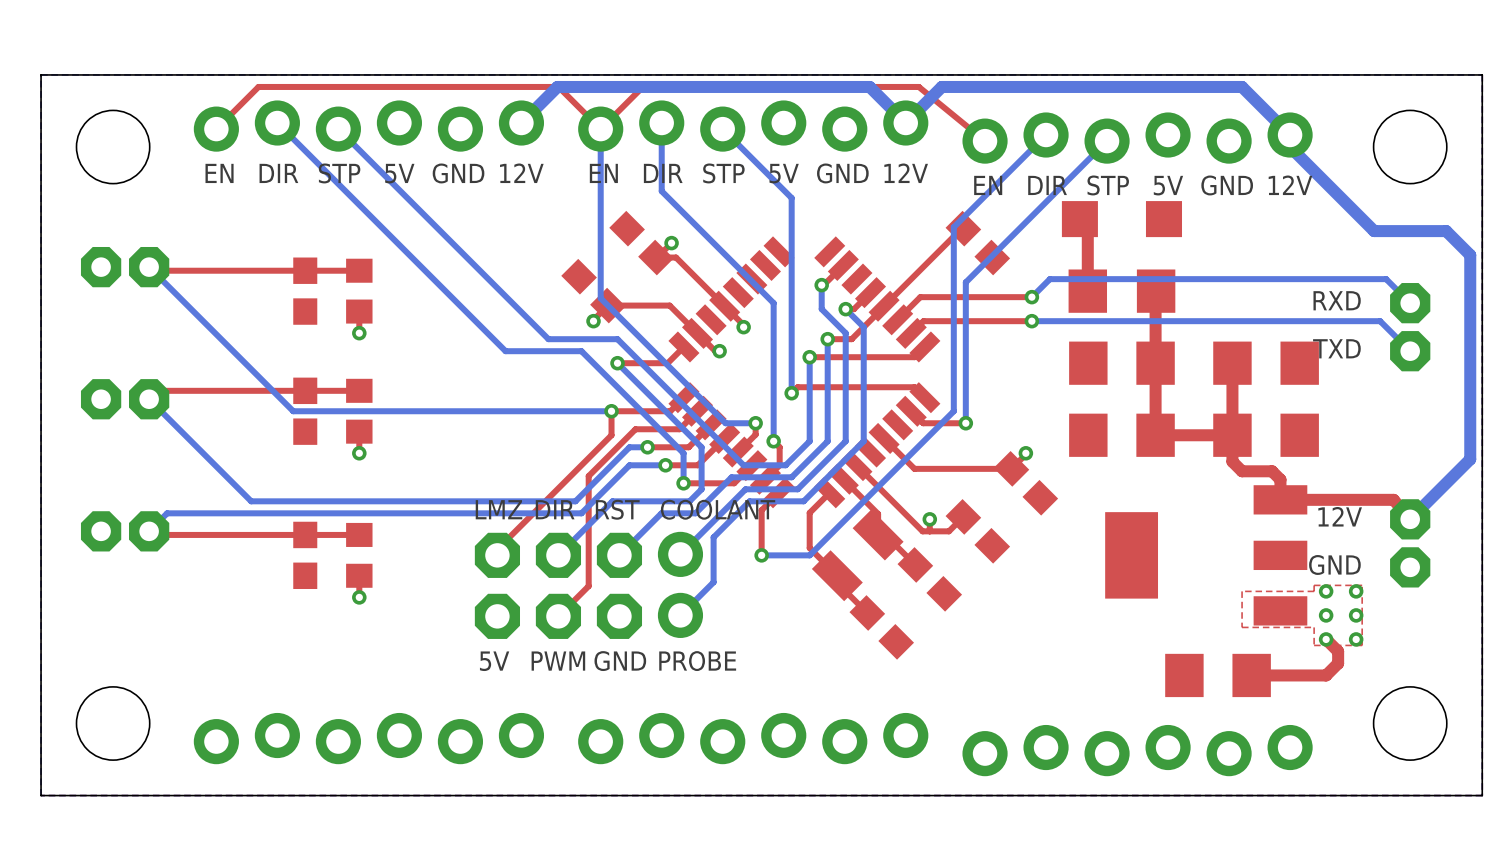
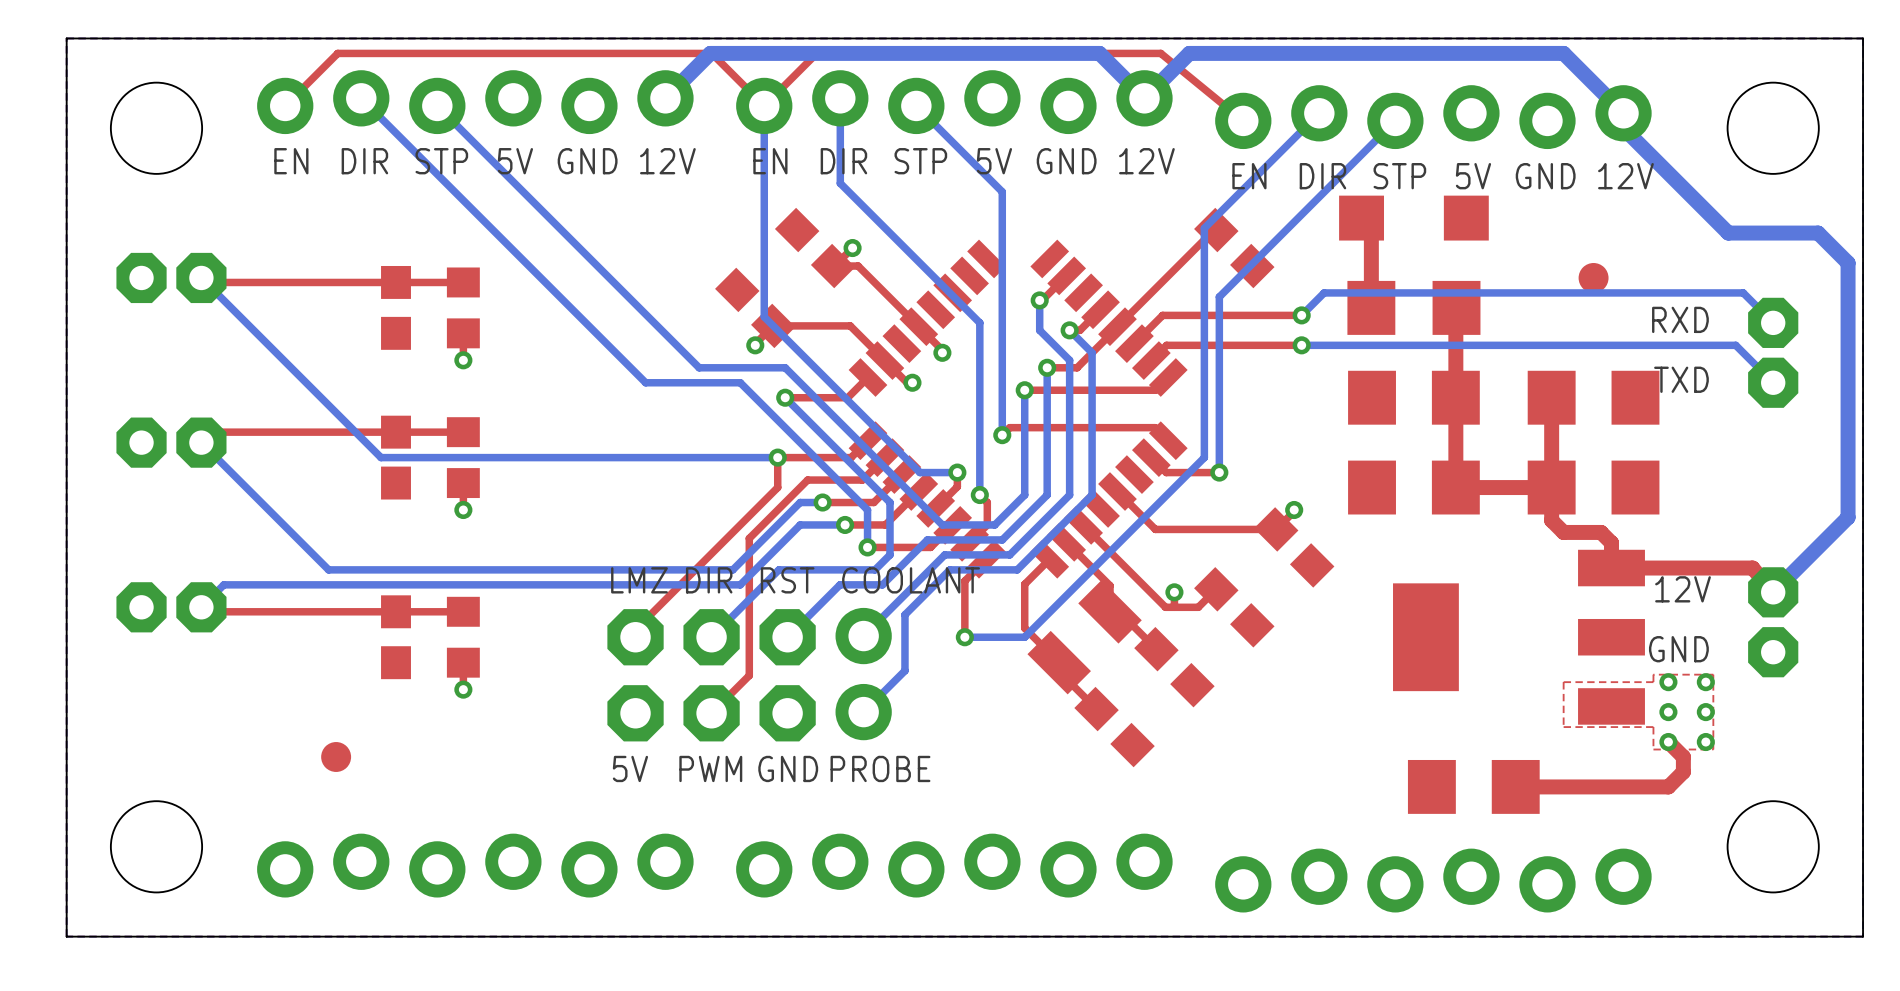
part: none -> (1593, 277)
part: none -> (336, 756)
part position: (1218, 675) -> (1473, 786)
top track: none -> (1575, 786) (1515, 786)

